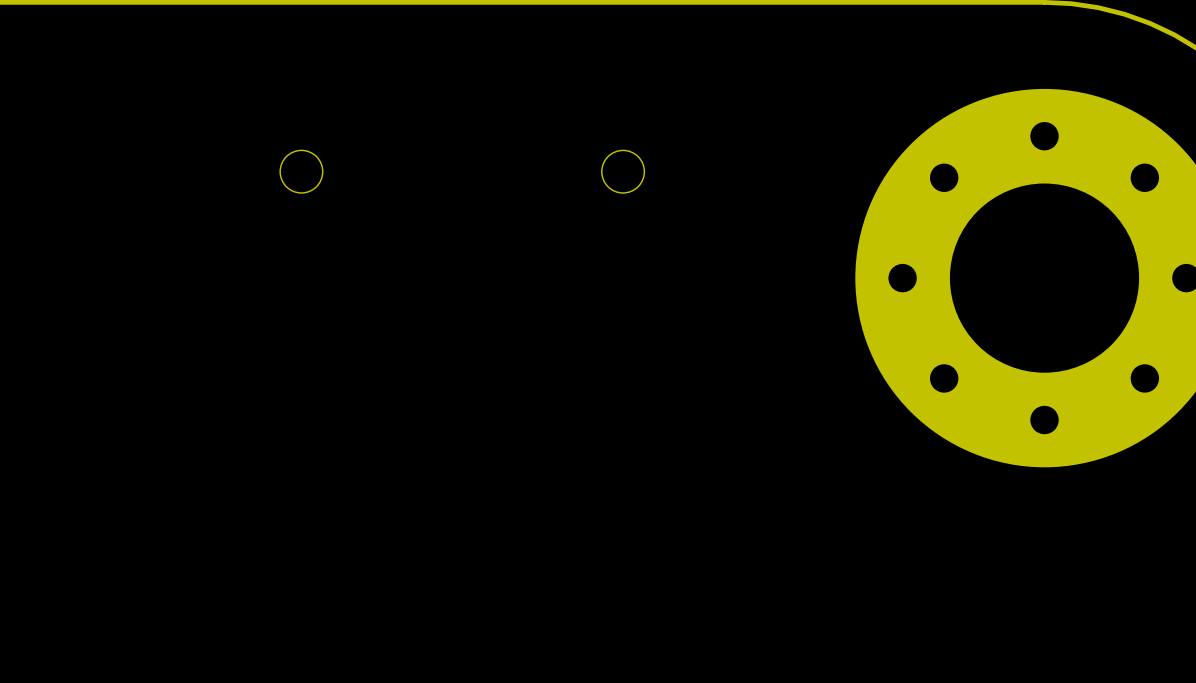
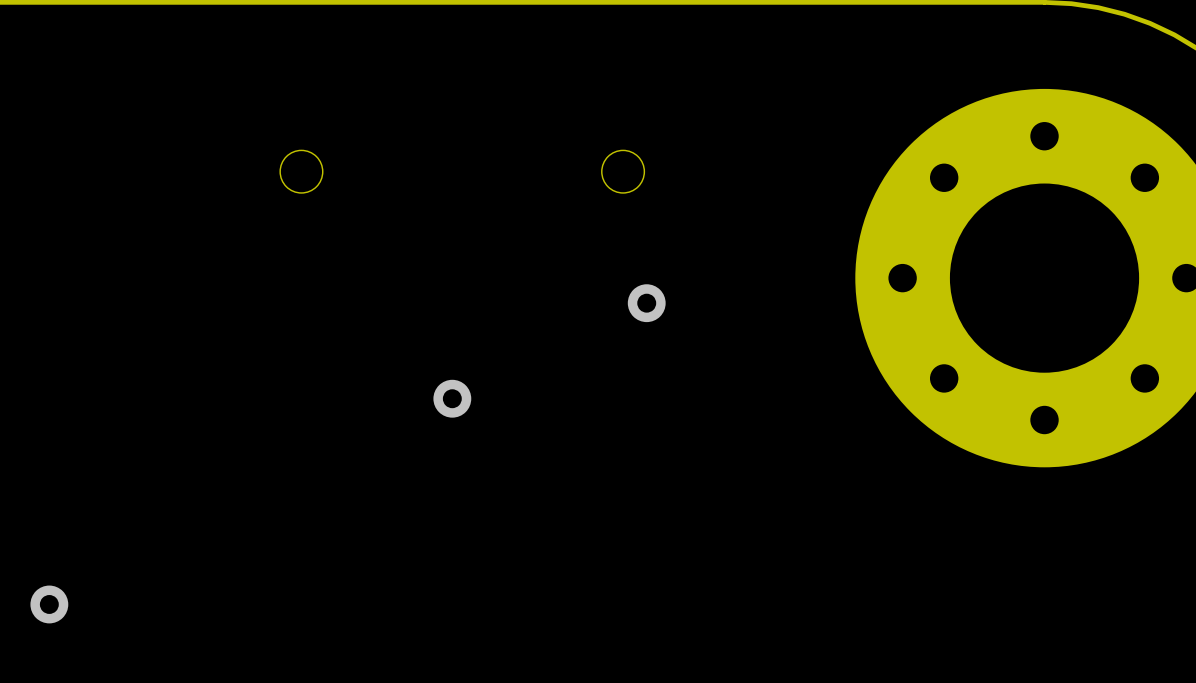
via: none -> (646, 303)
via: none -> (452, 398)
via: none -> (49, 604)

